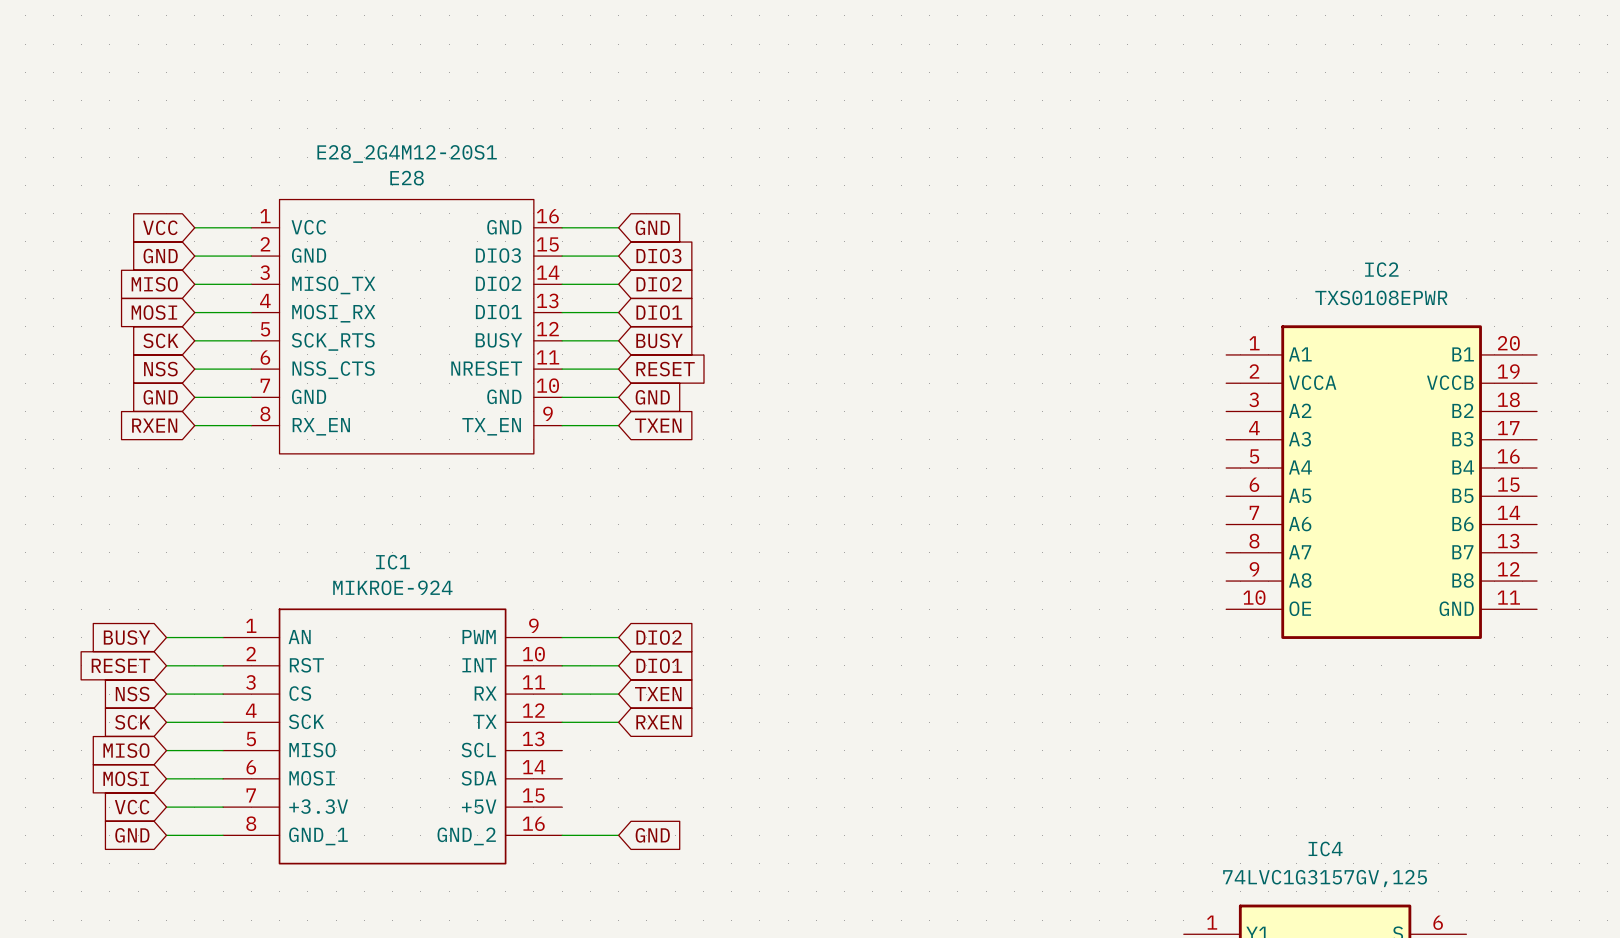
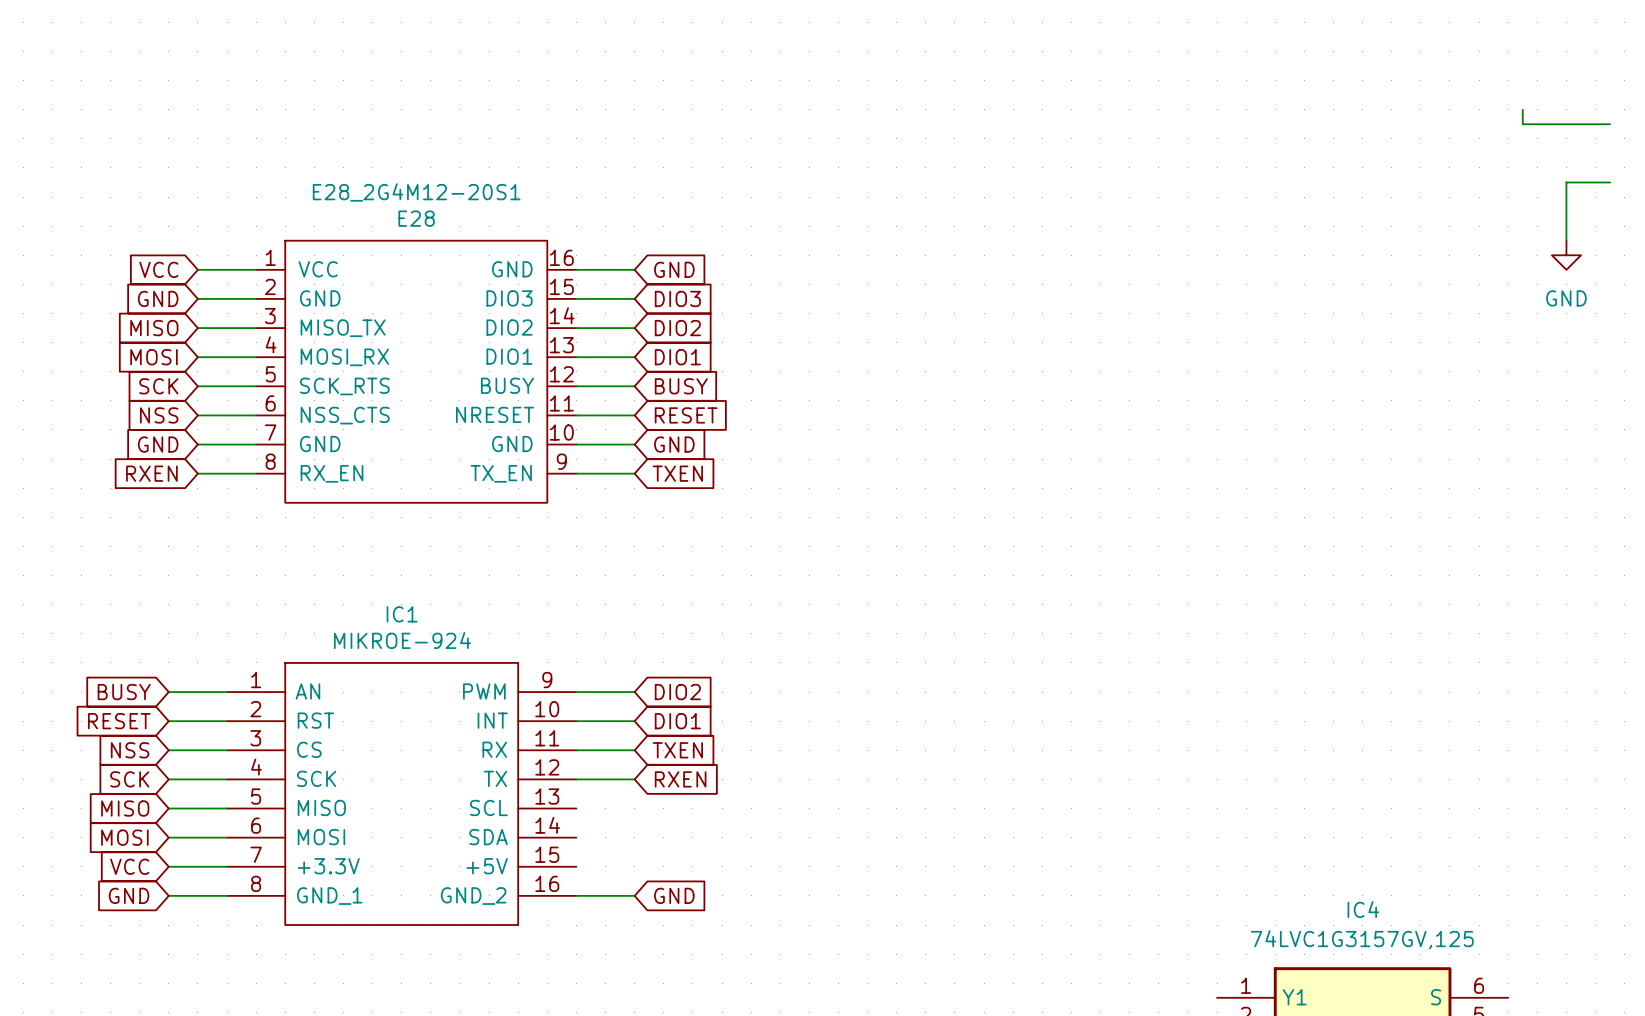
wire: none -> (1522, 109) (1522, 124) (1610, 124)
wire: none -> (1610, 182) (1566, 182) (1566, 240)
power symbol: none -> GND (1566, 255)
IC2: TXS0108EPWR (1381, 482) -> none

